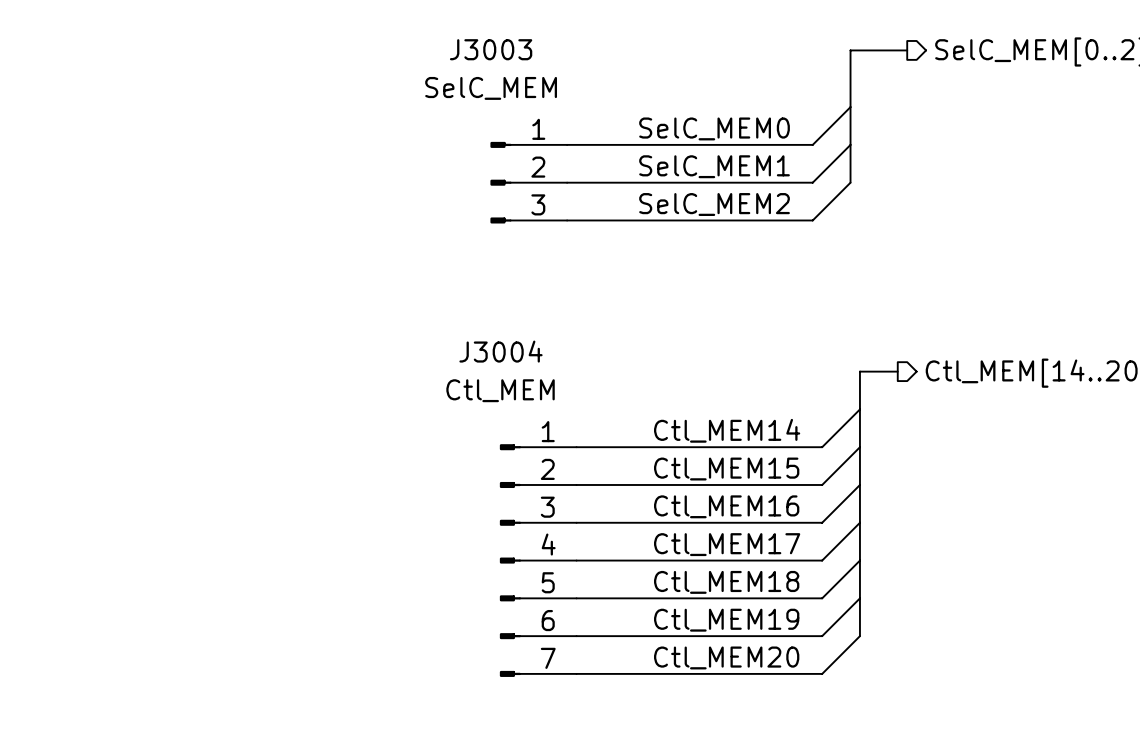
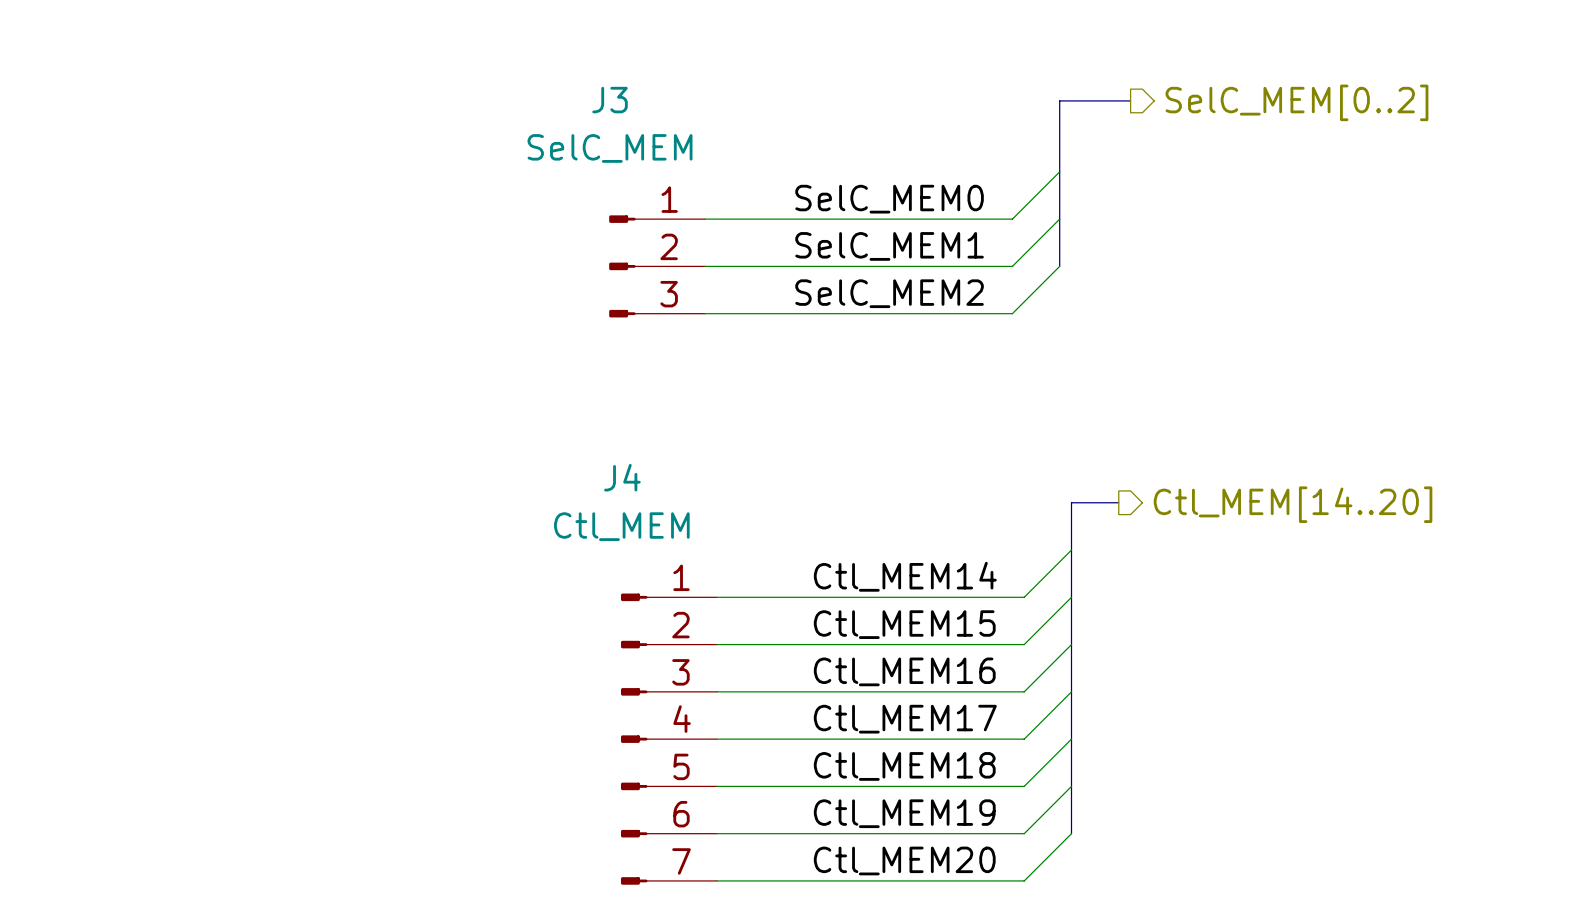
J3003 name: J3003 (491, 49) -> J3 (610, 100)
J3004 name: J3004 (500, 351) -> J4 (622, 477)

